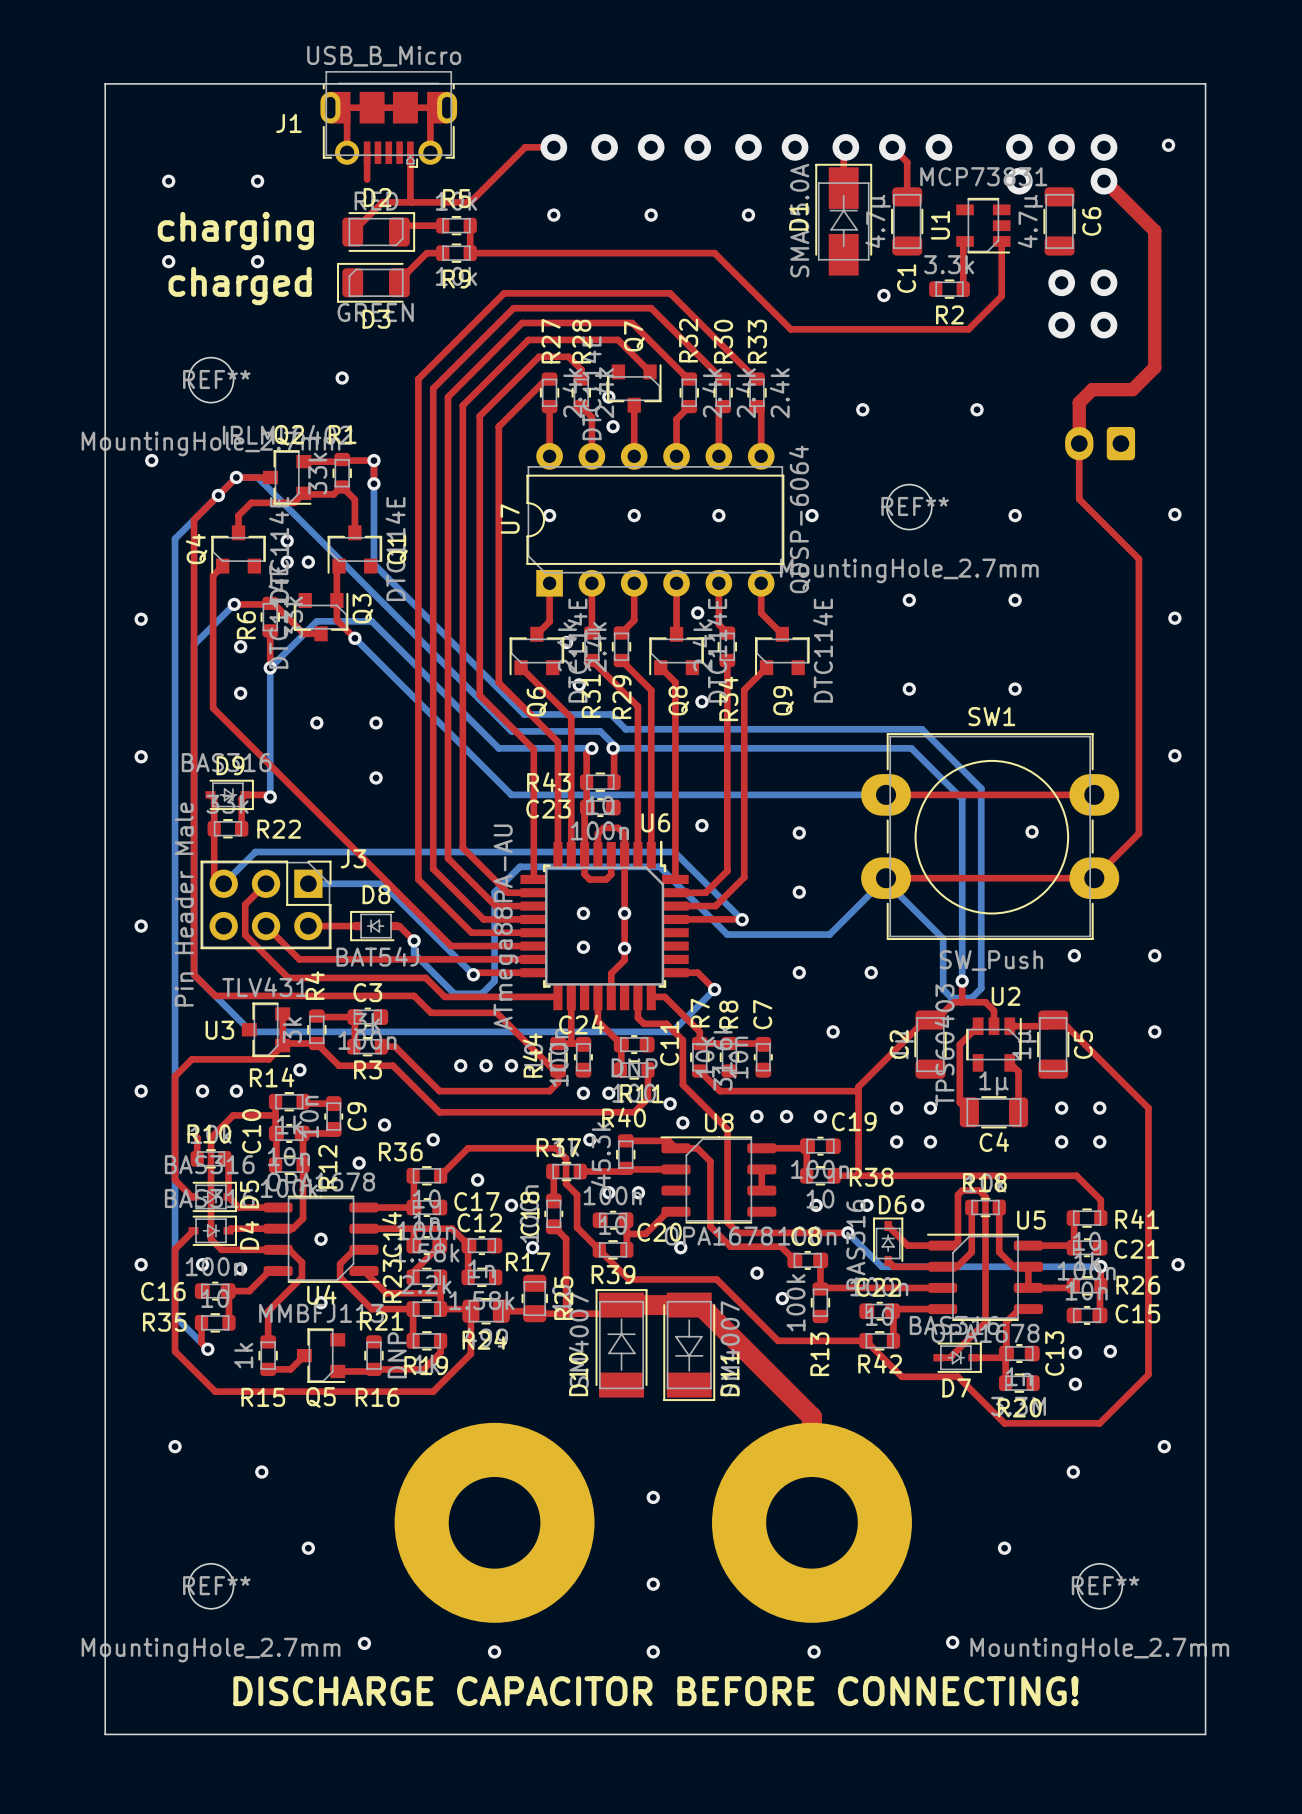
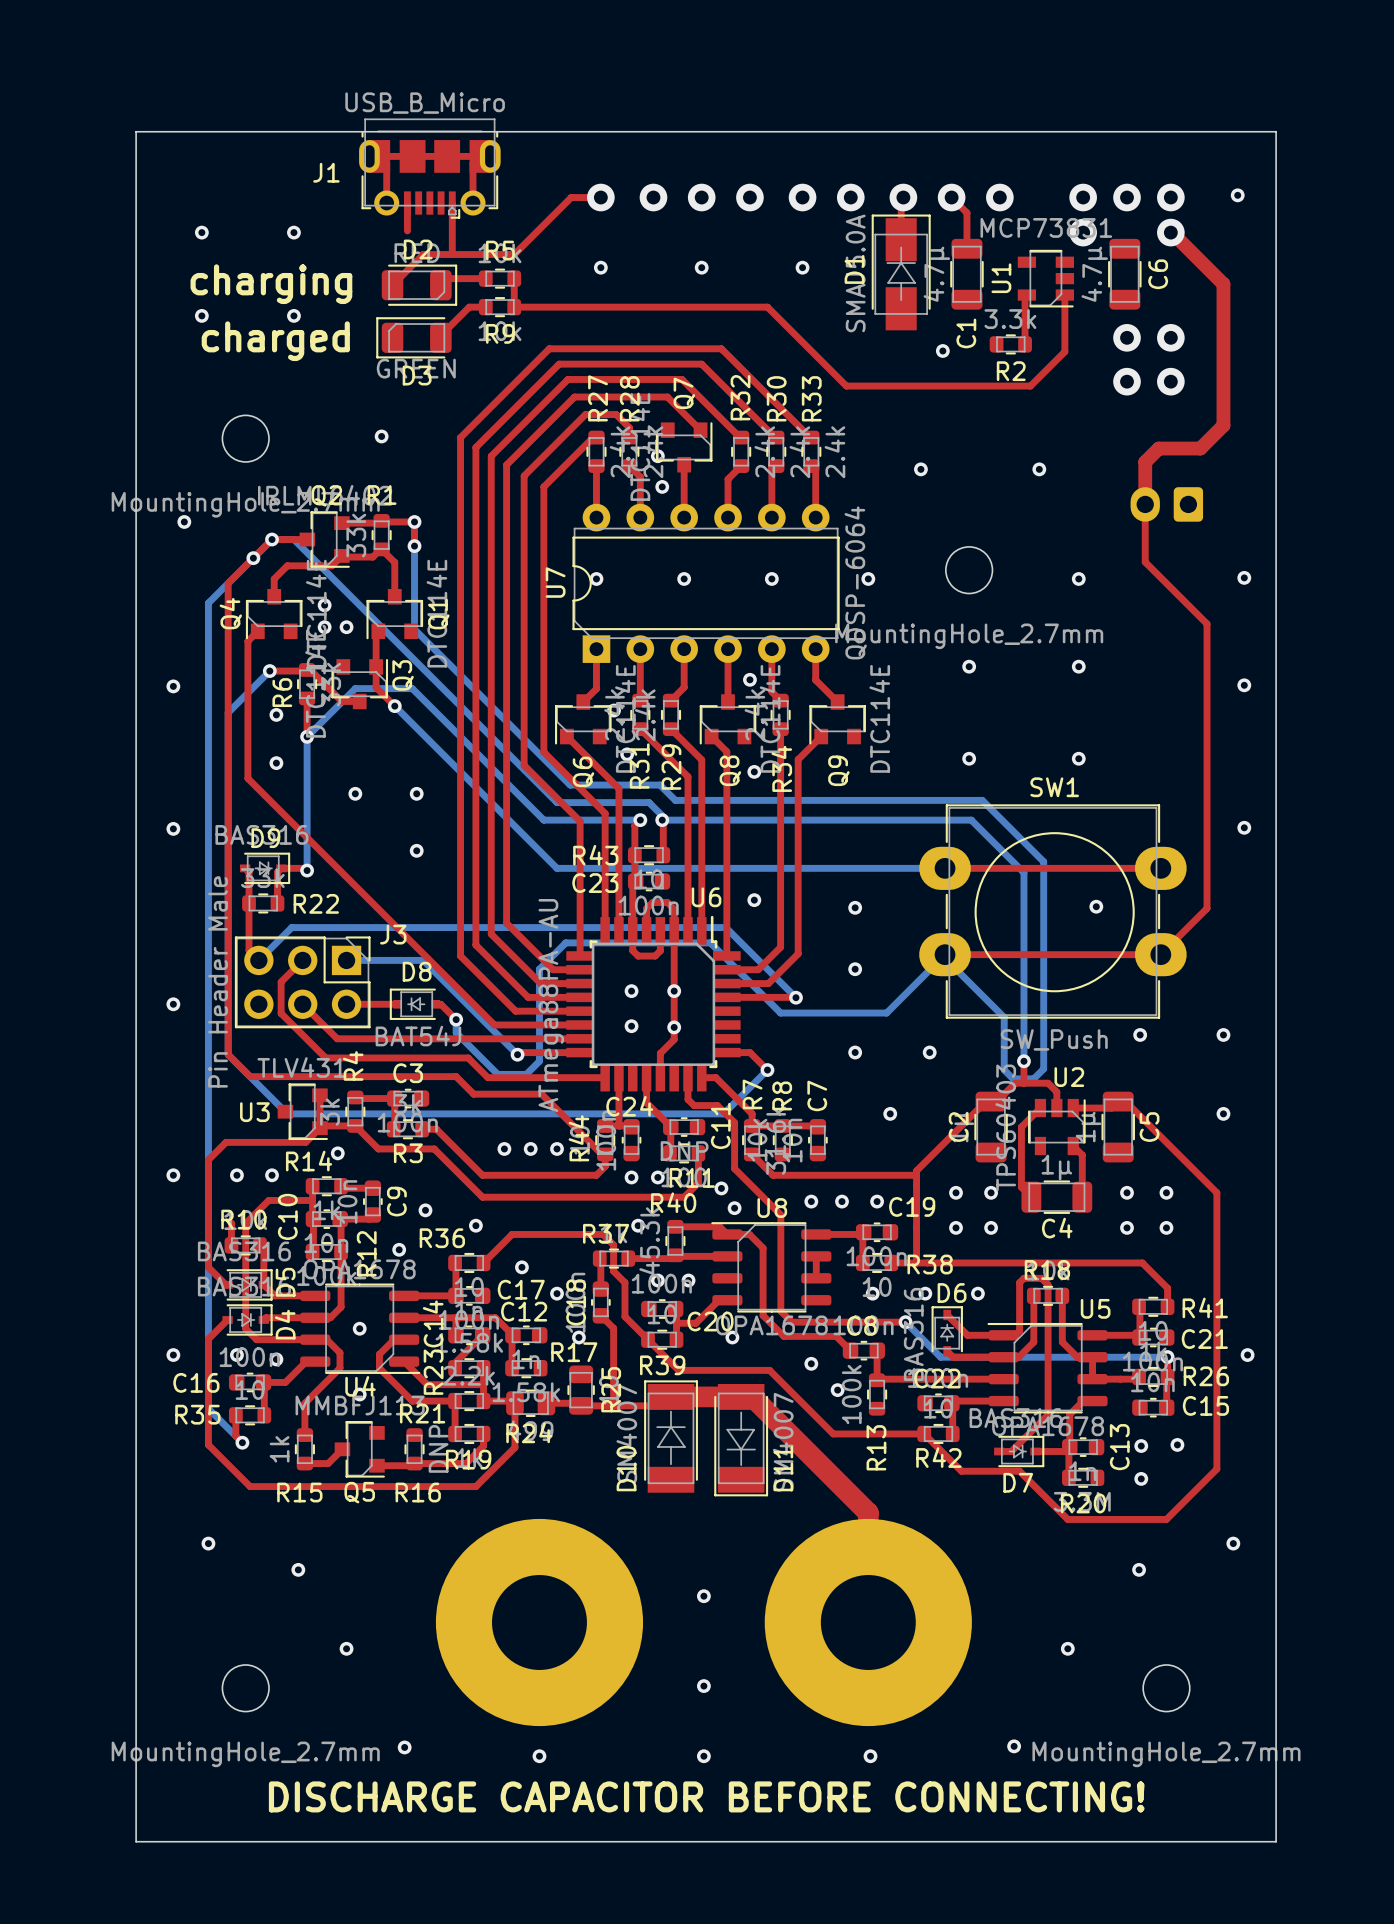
REF** name: REF** (216, 379) -> none
REF** name: REF** (915, 506) -> none
REF** name: REF** (216, 1585) -> none
REF** name: REF** (1105, 1585) -> none

